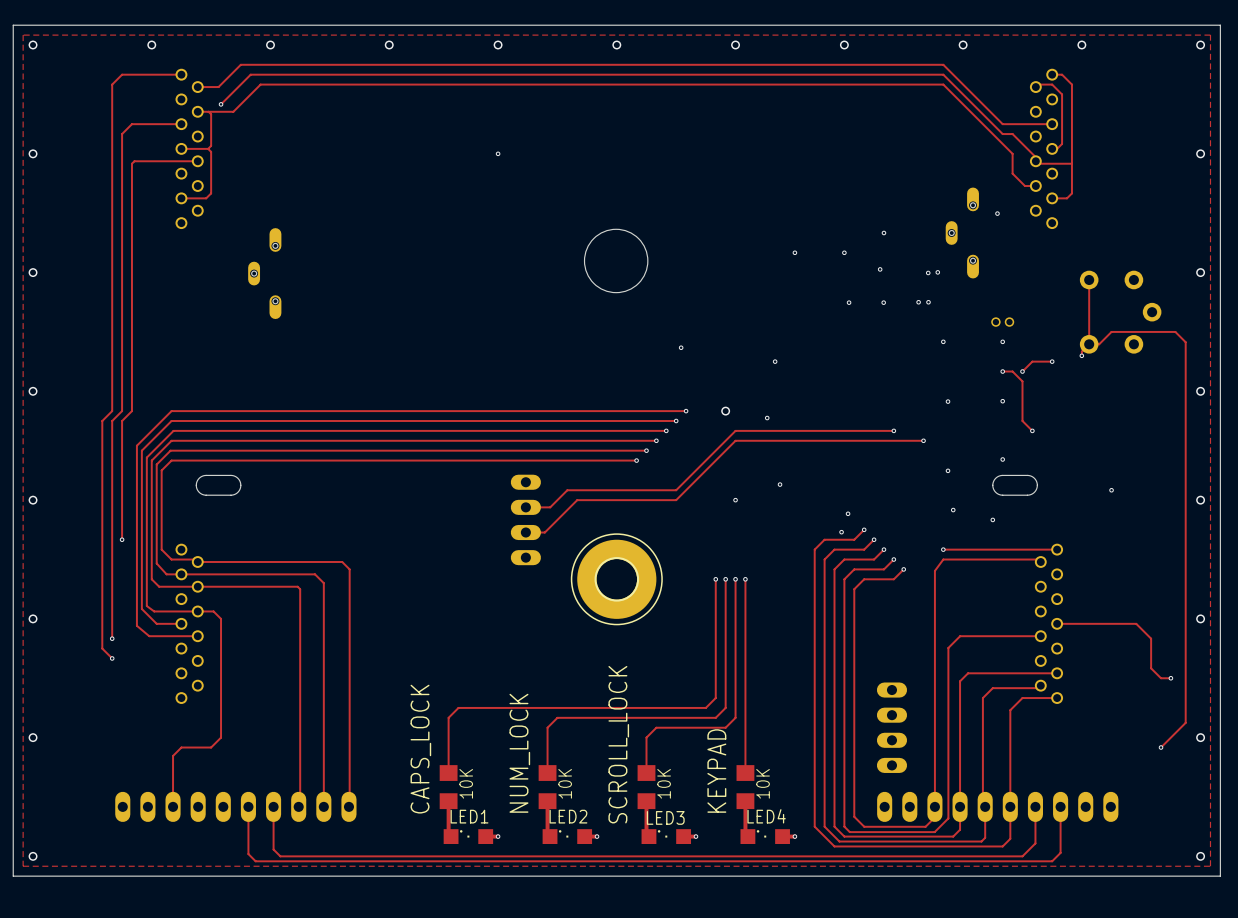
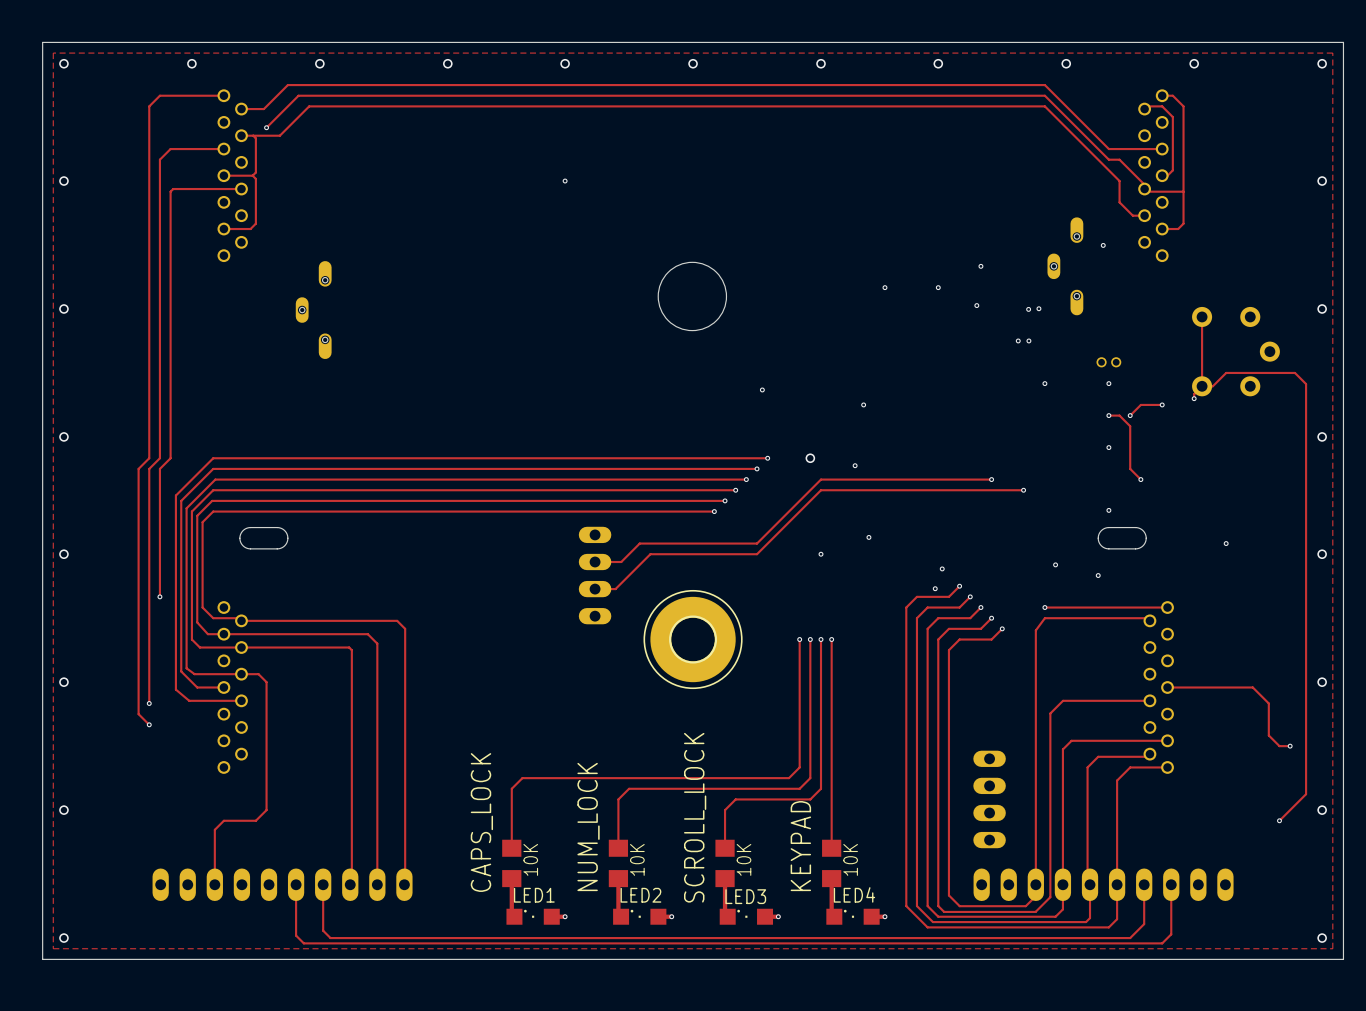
via: (849, 302) -> none
via: (883, 302) -> none
via: (948, 401) -> none
via: (948, 470) -> none

